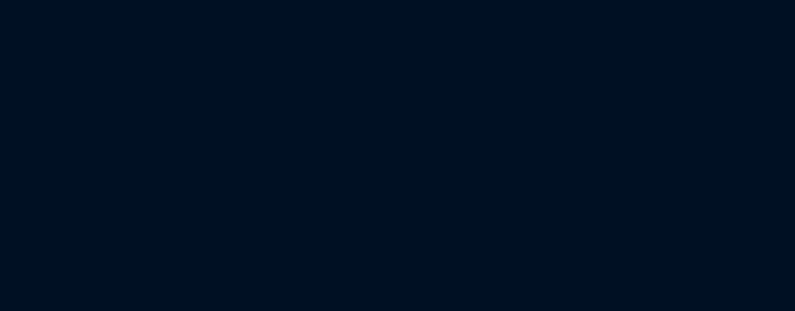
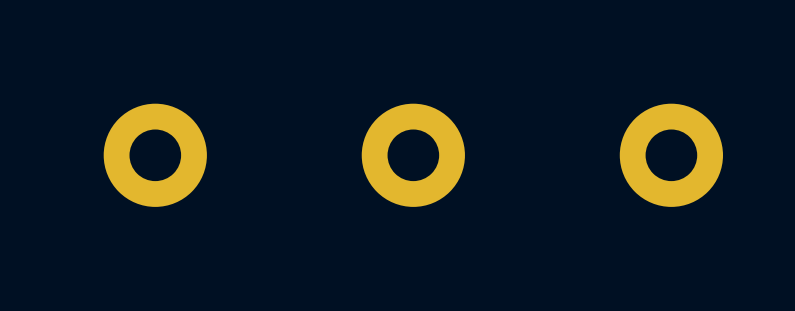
part: none -> (155, 155)
part: none -> (413, 155)
part: none -> (671, 155)

